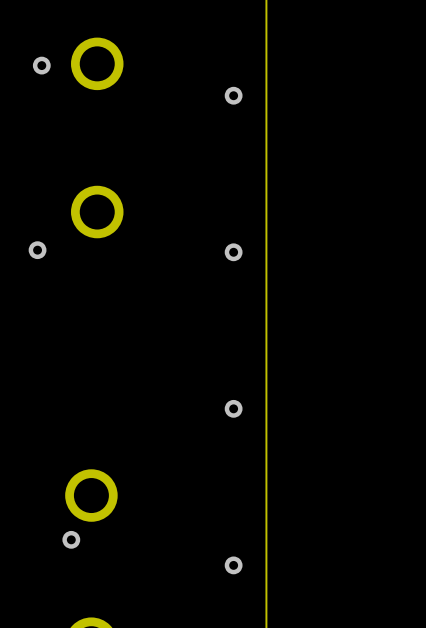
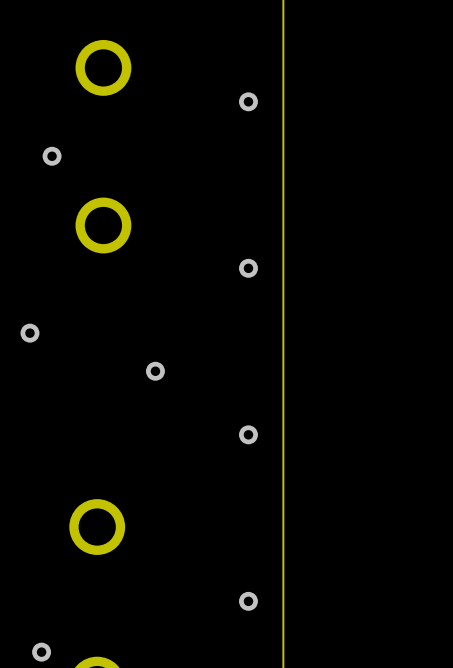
via: (41, 65) -> none
via: none -> (52, 156)
via: (37, 250) -> none
via: none -> (29, 333)
via: none -> (155, 371)
via: (71, 539) -> none
via: none -> (41, 652)

